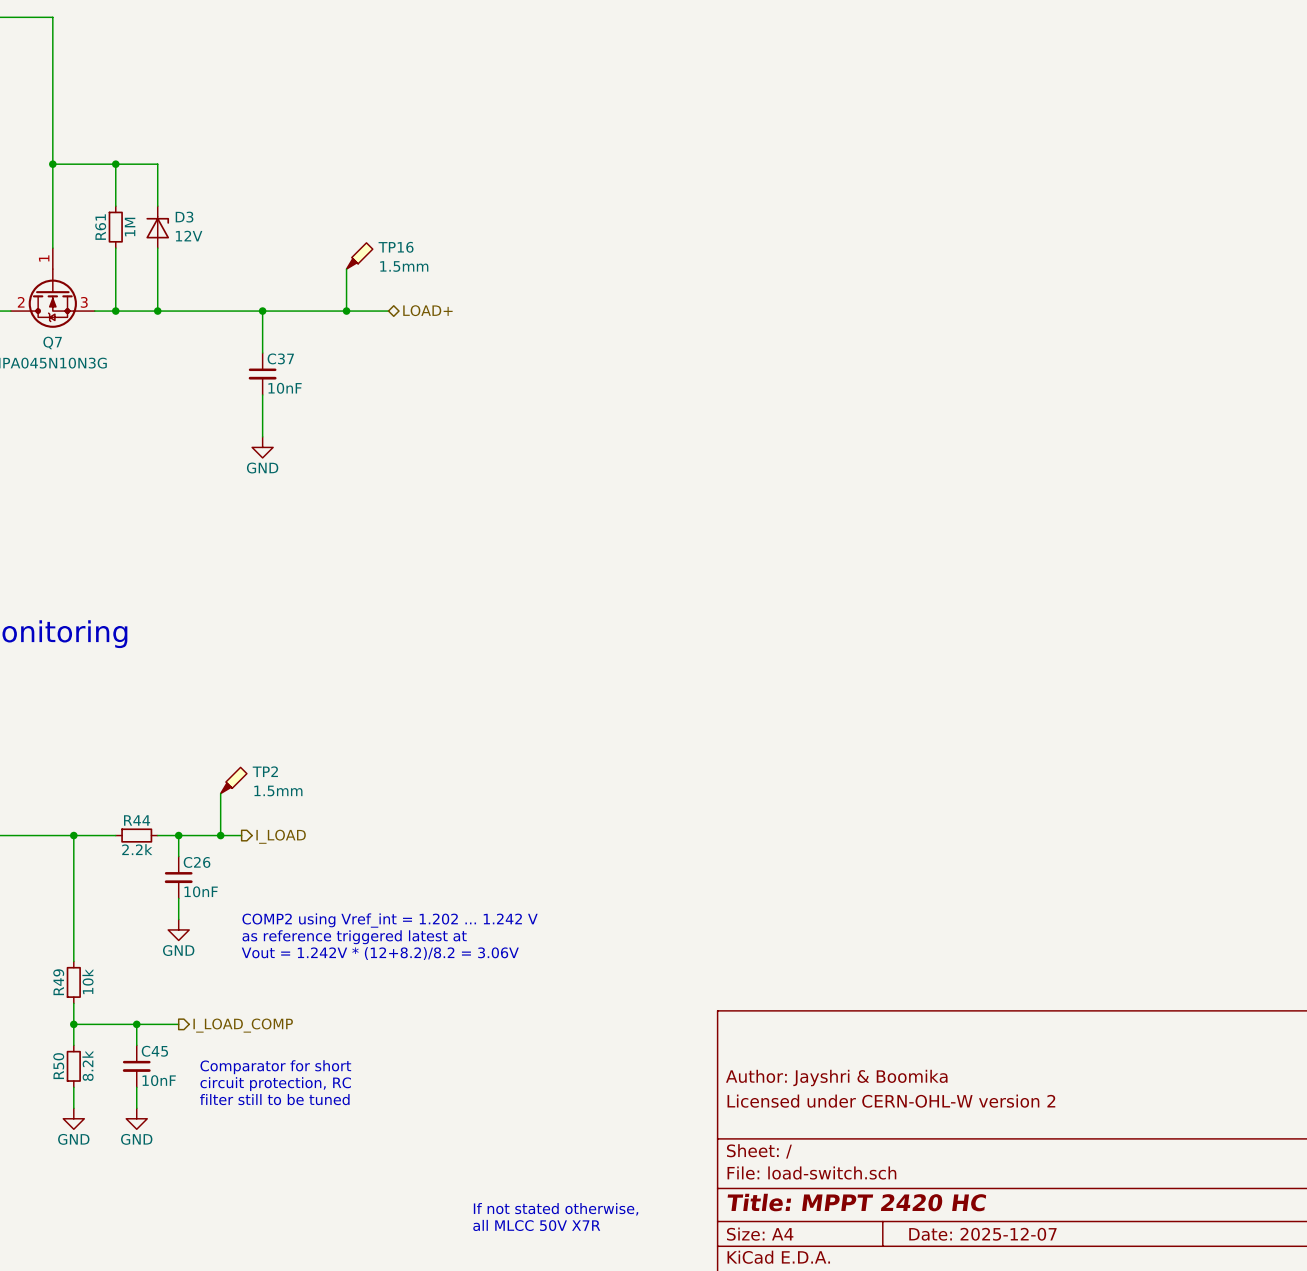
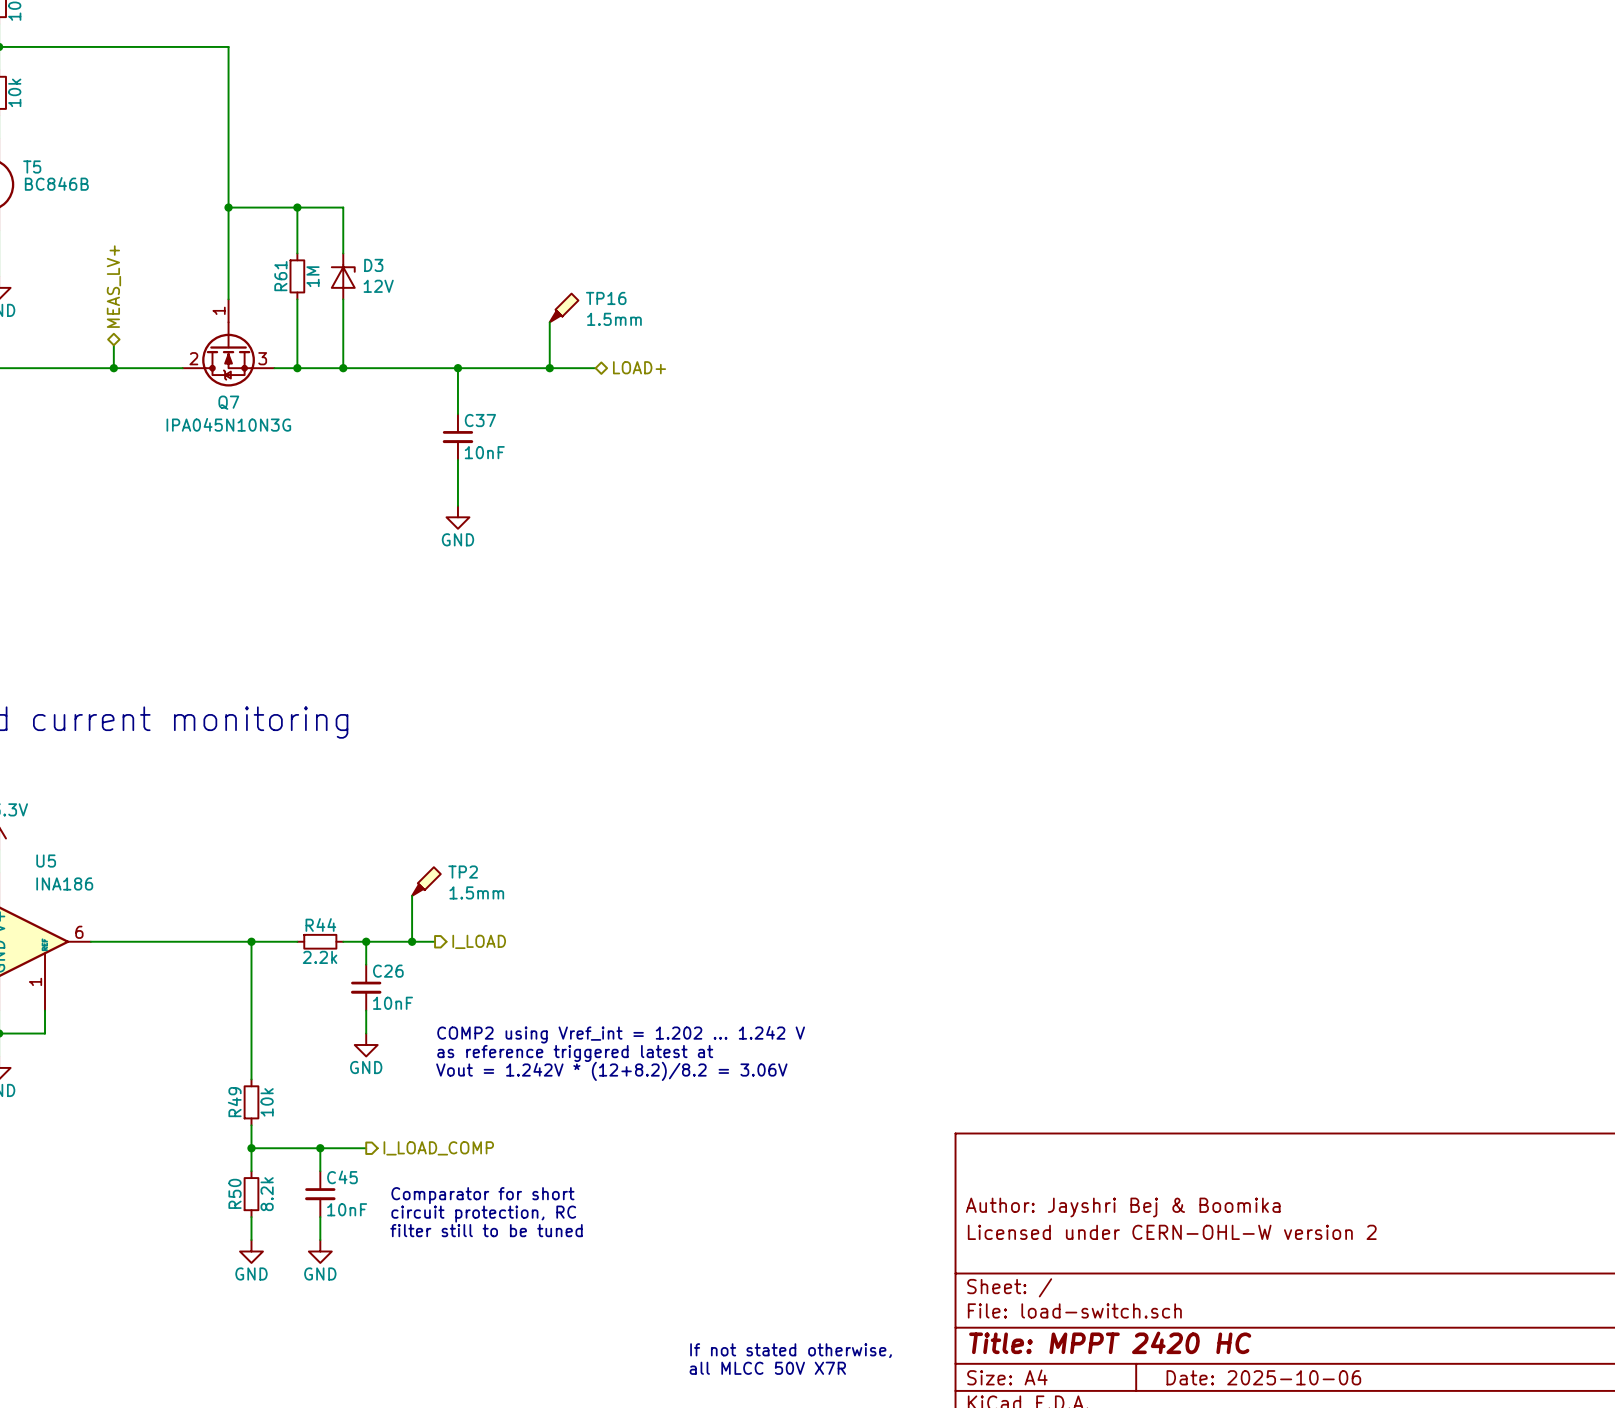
title block: Author: Jayshri & Boomika (836, 1078) -> Author: Jayshri Bej & Boomika (1123, 1207)
title block: Date: 2025-12-07 (982, 1234) -> Date: 2025-10-06 (1263, 1377)

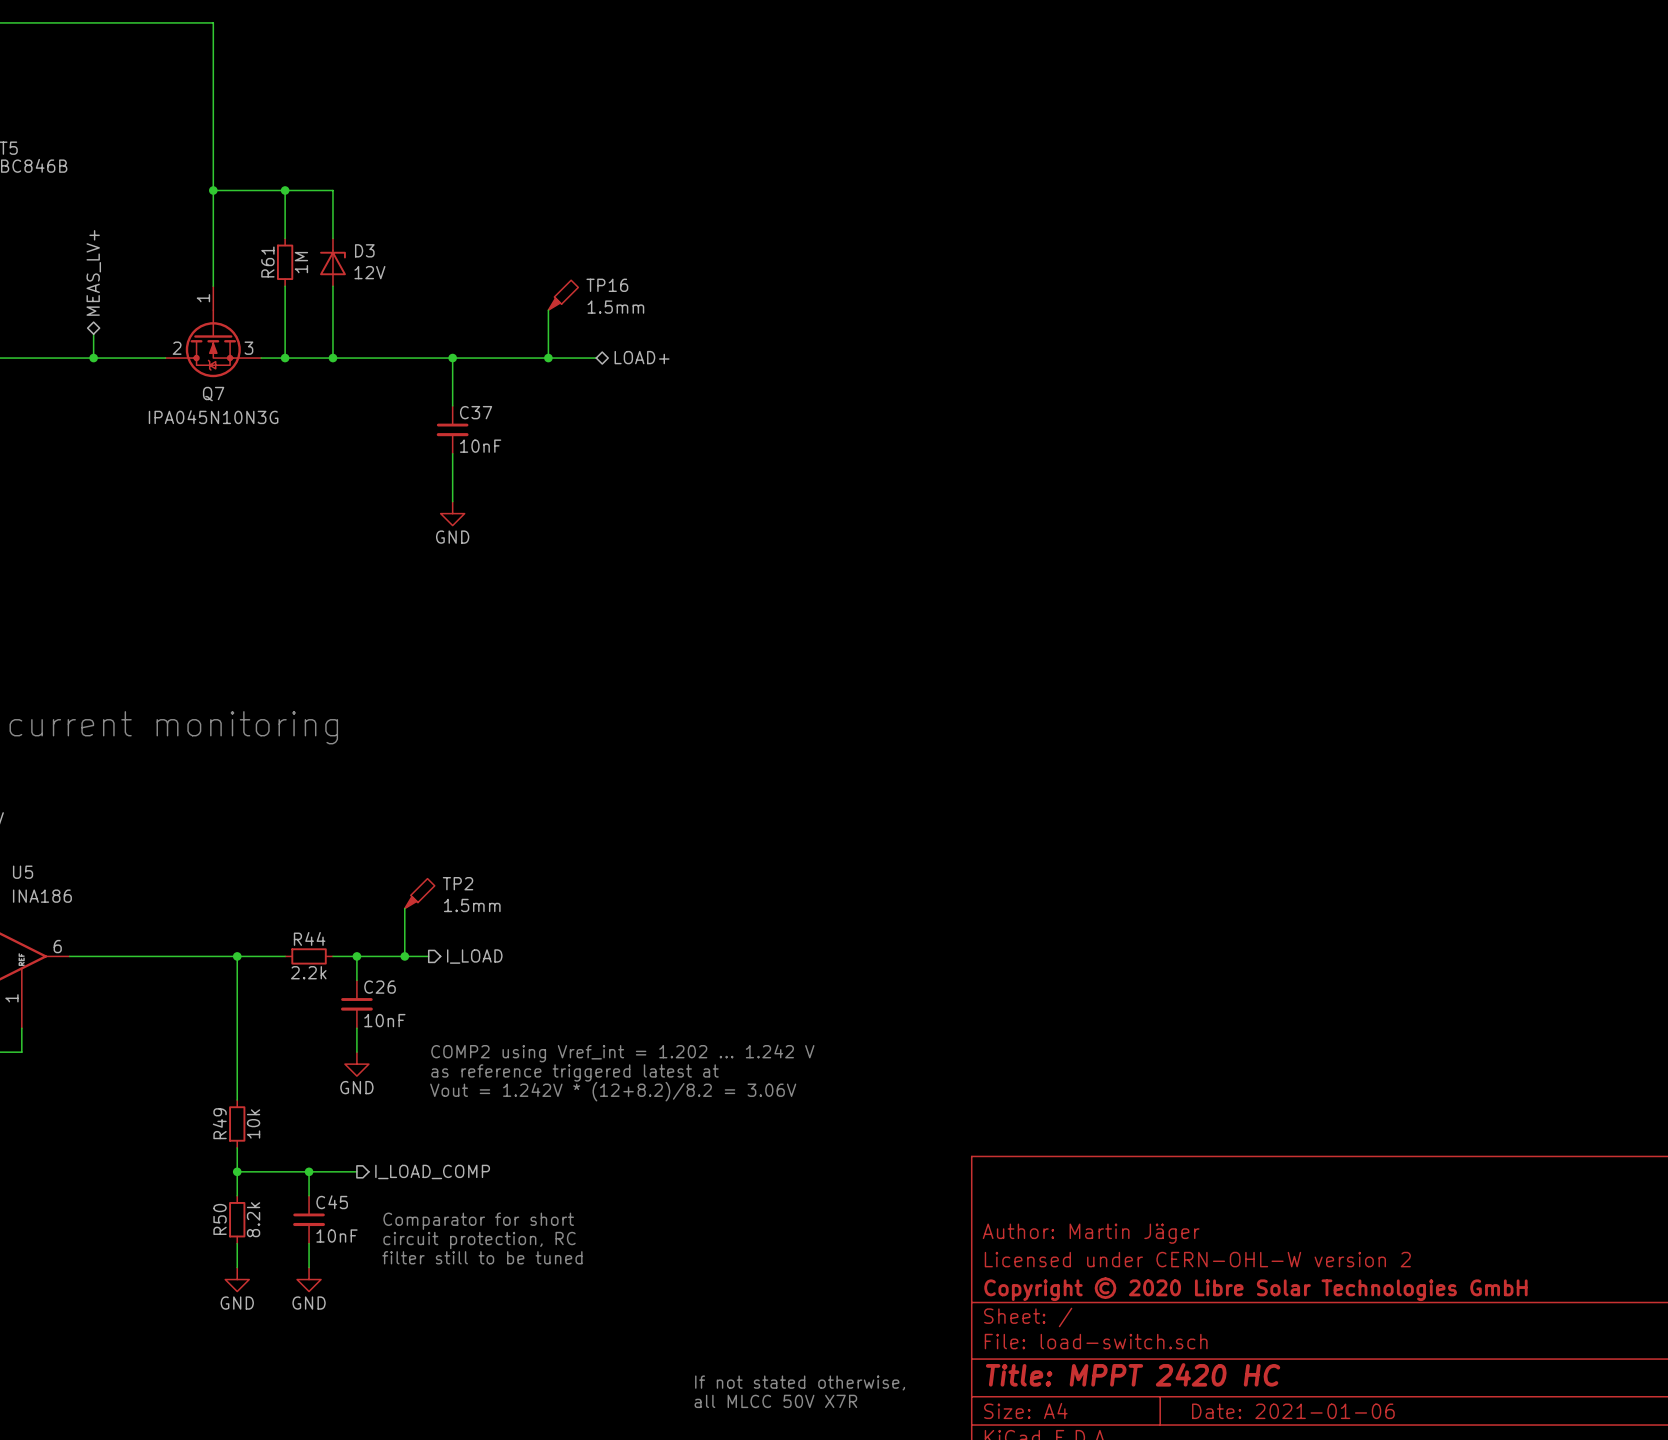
title block: Author: Jayshri Bej & Boomika (1123, 1207) -> Author: Martin Jäger (1091, 1233)
title block: none -> Copyright © 2020 Libre Solar Technologies GmbH (1255, 1289)
title block: Date: 2025-10-06 (1263, 1377) -> Date: 2021-01-06 (1293, 1411)

